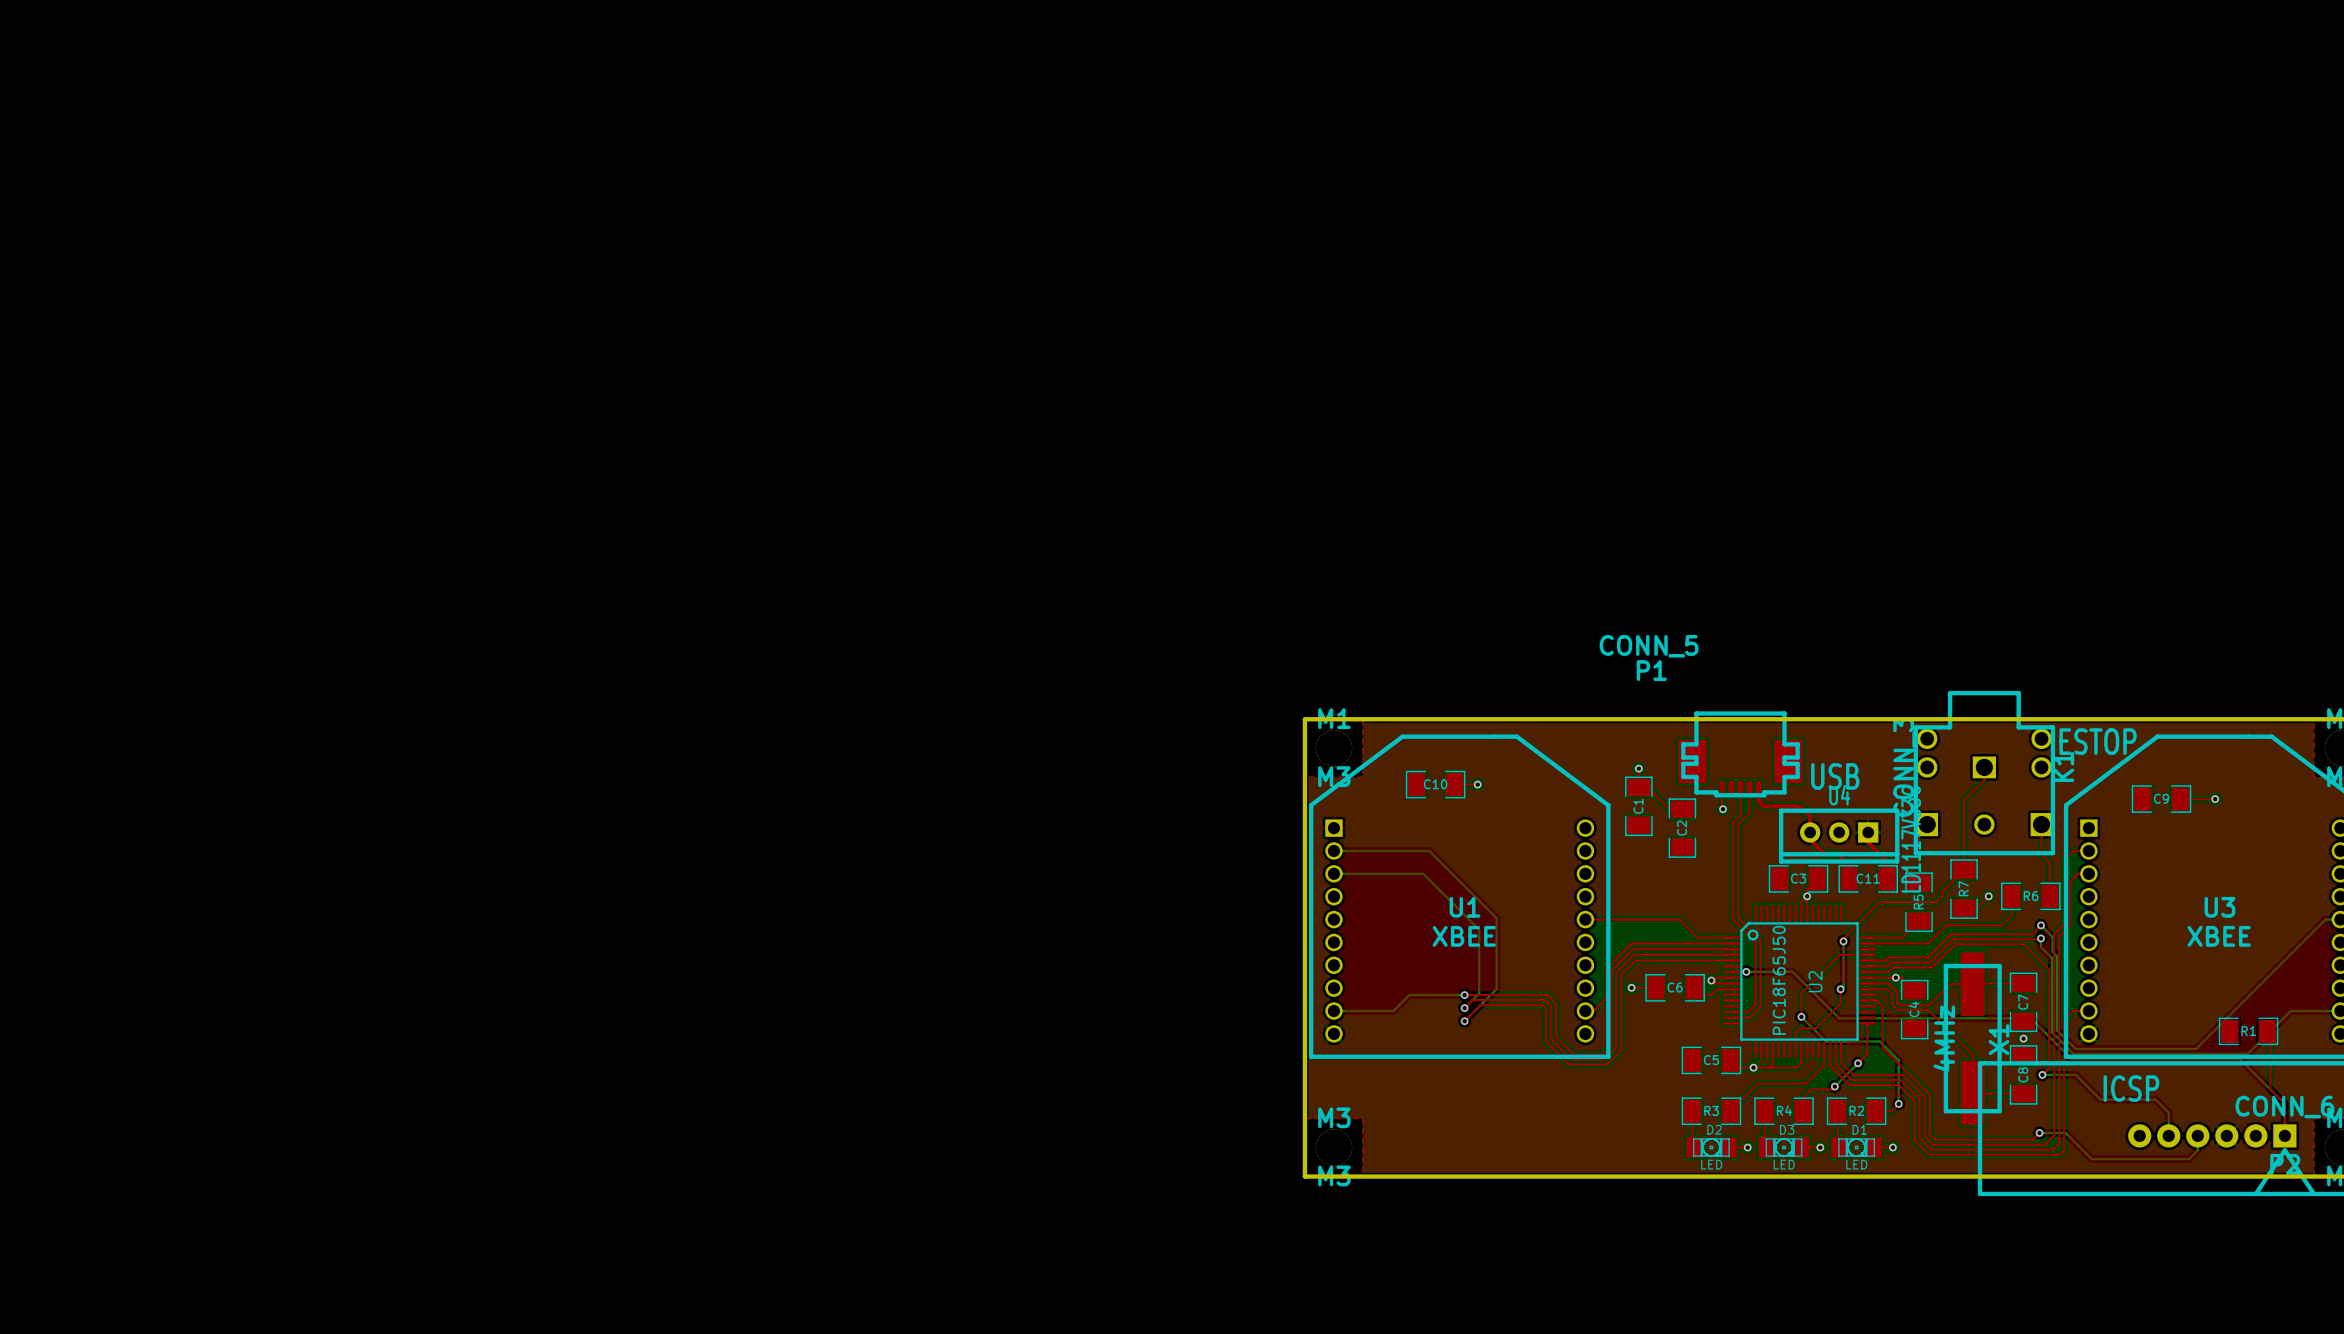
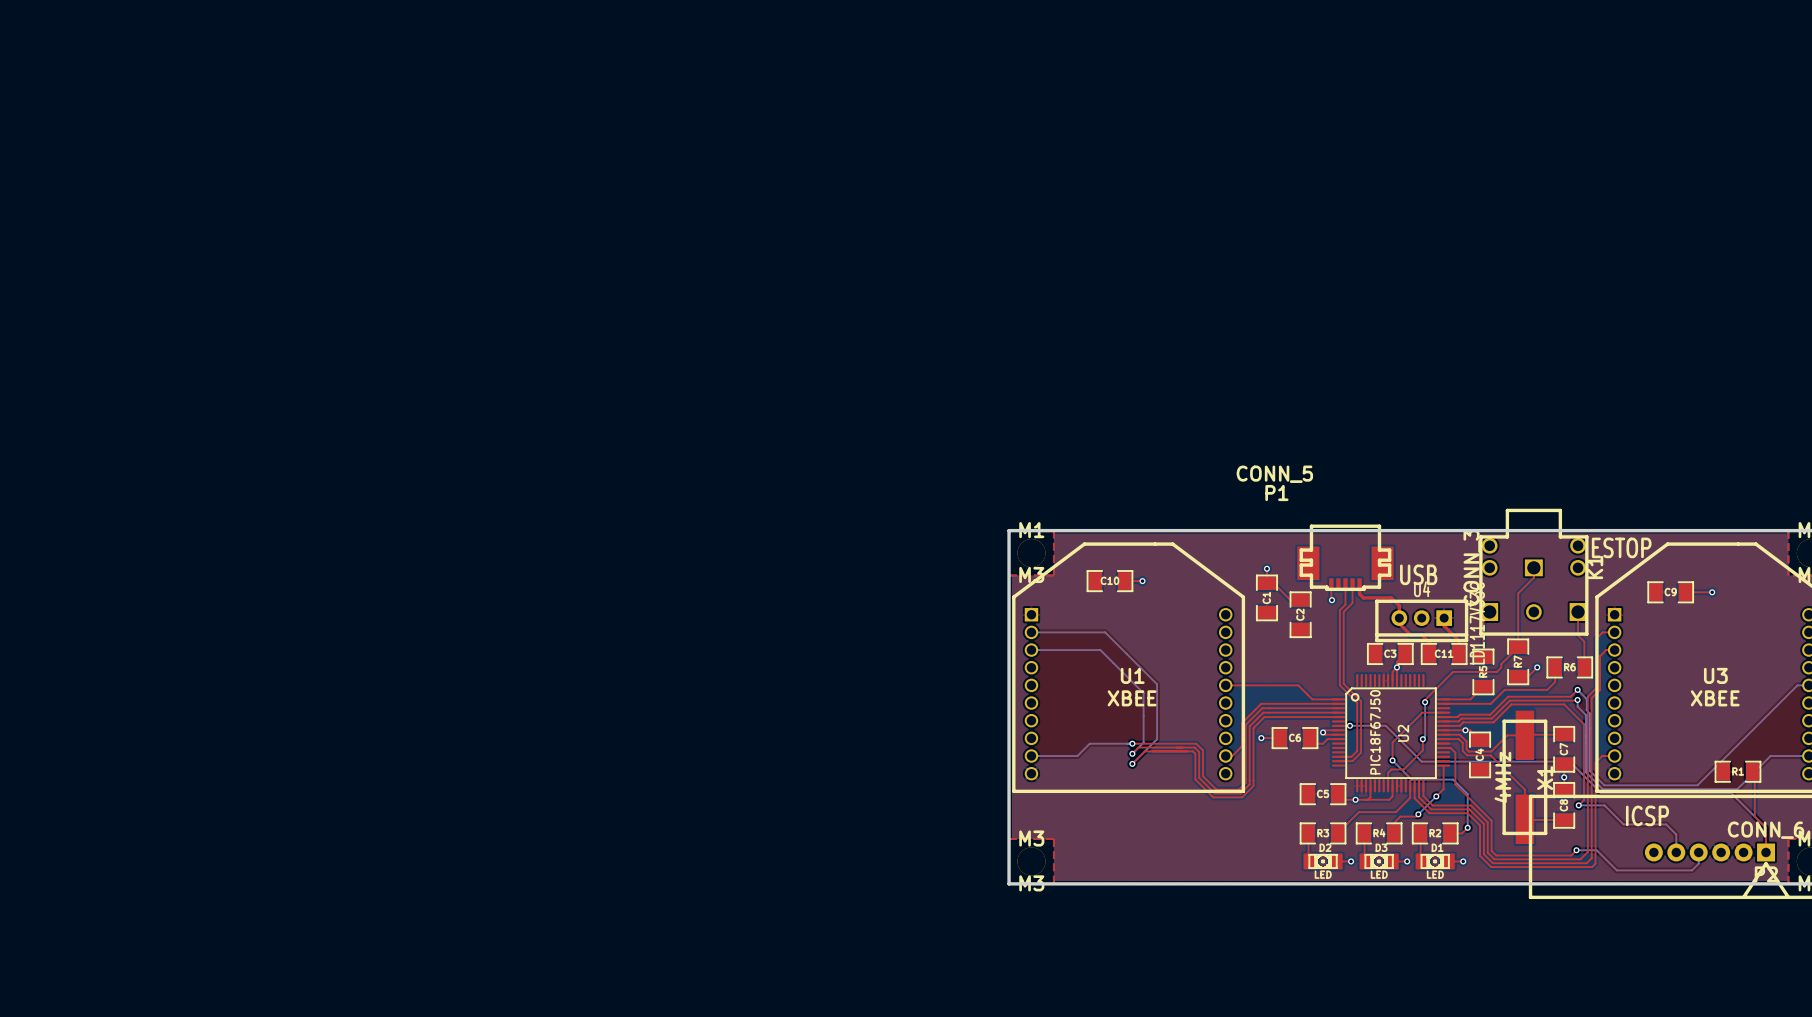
U2 value: PIC18F65J50 (1779, 980) -> PIC18F67J50 (1375, 732)

